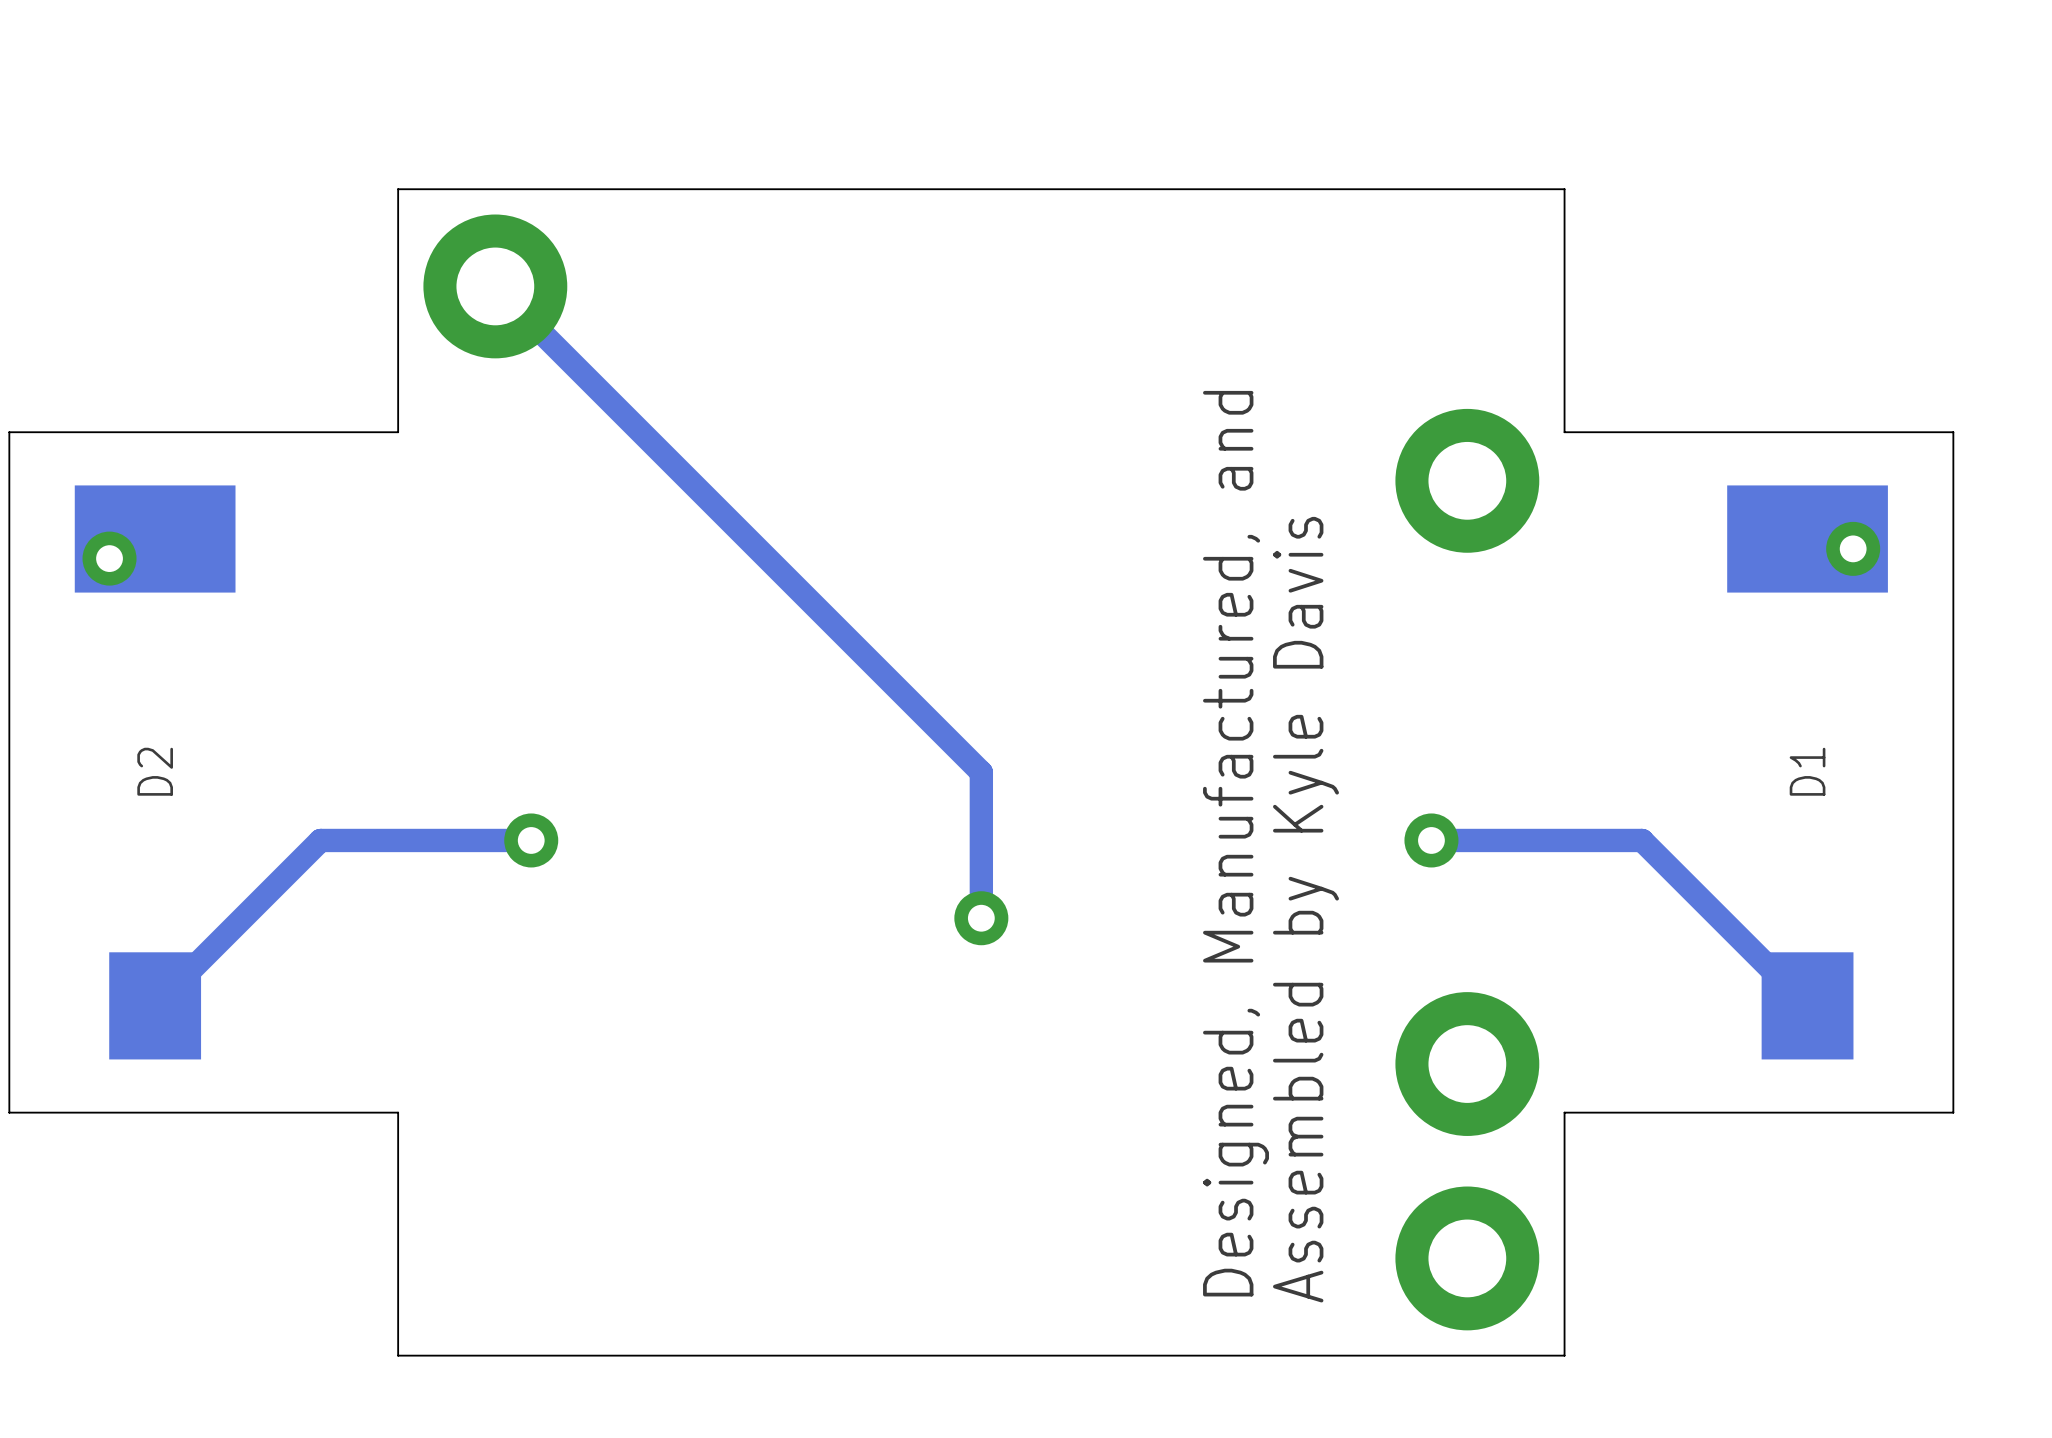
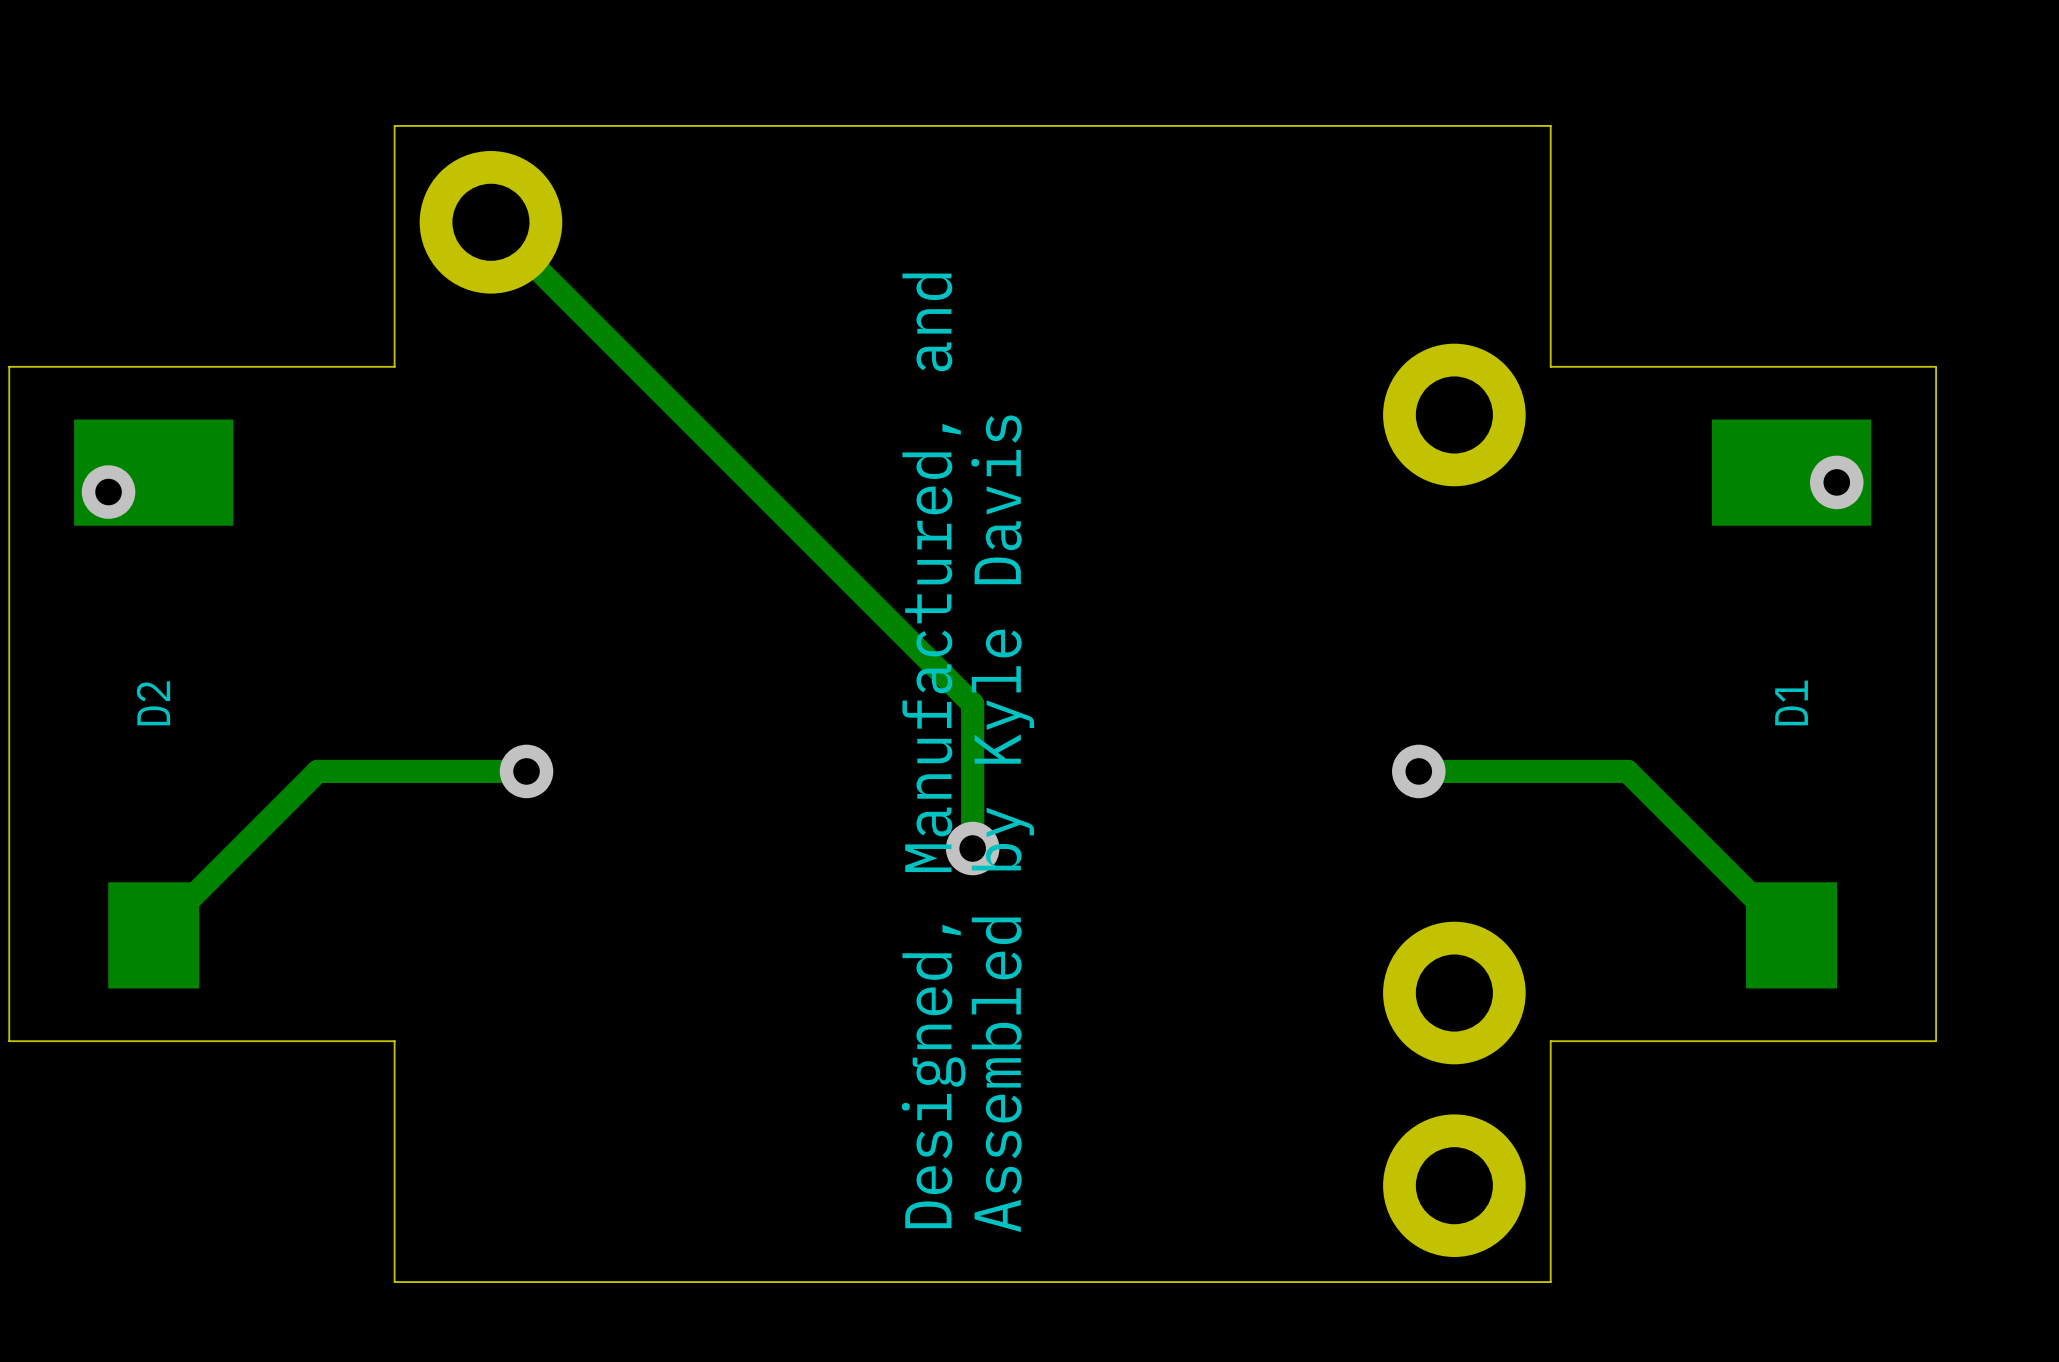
text position: Designed, Manufactured, and (1236, 843) -> Designed, Manufactured, and (933, 750)
text position: Assembled by Kyle Davis (1305, 909) -> Assembled by Kyle Davis (1002, 823)

